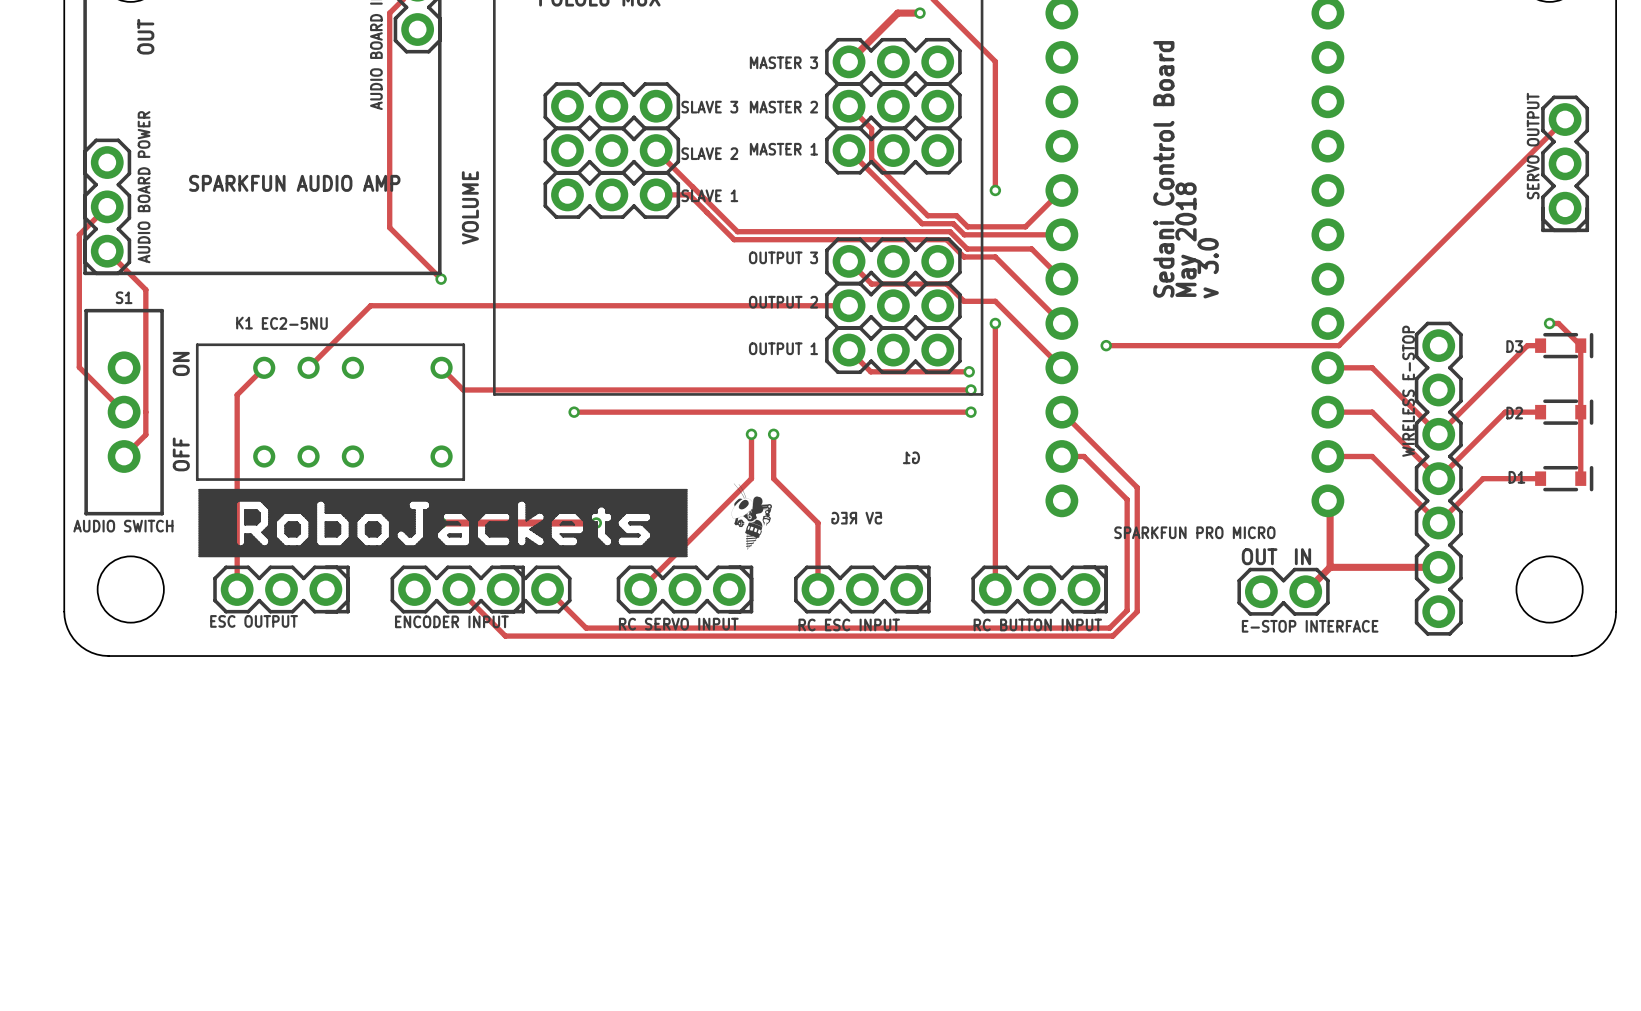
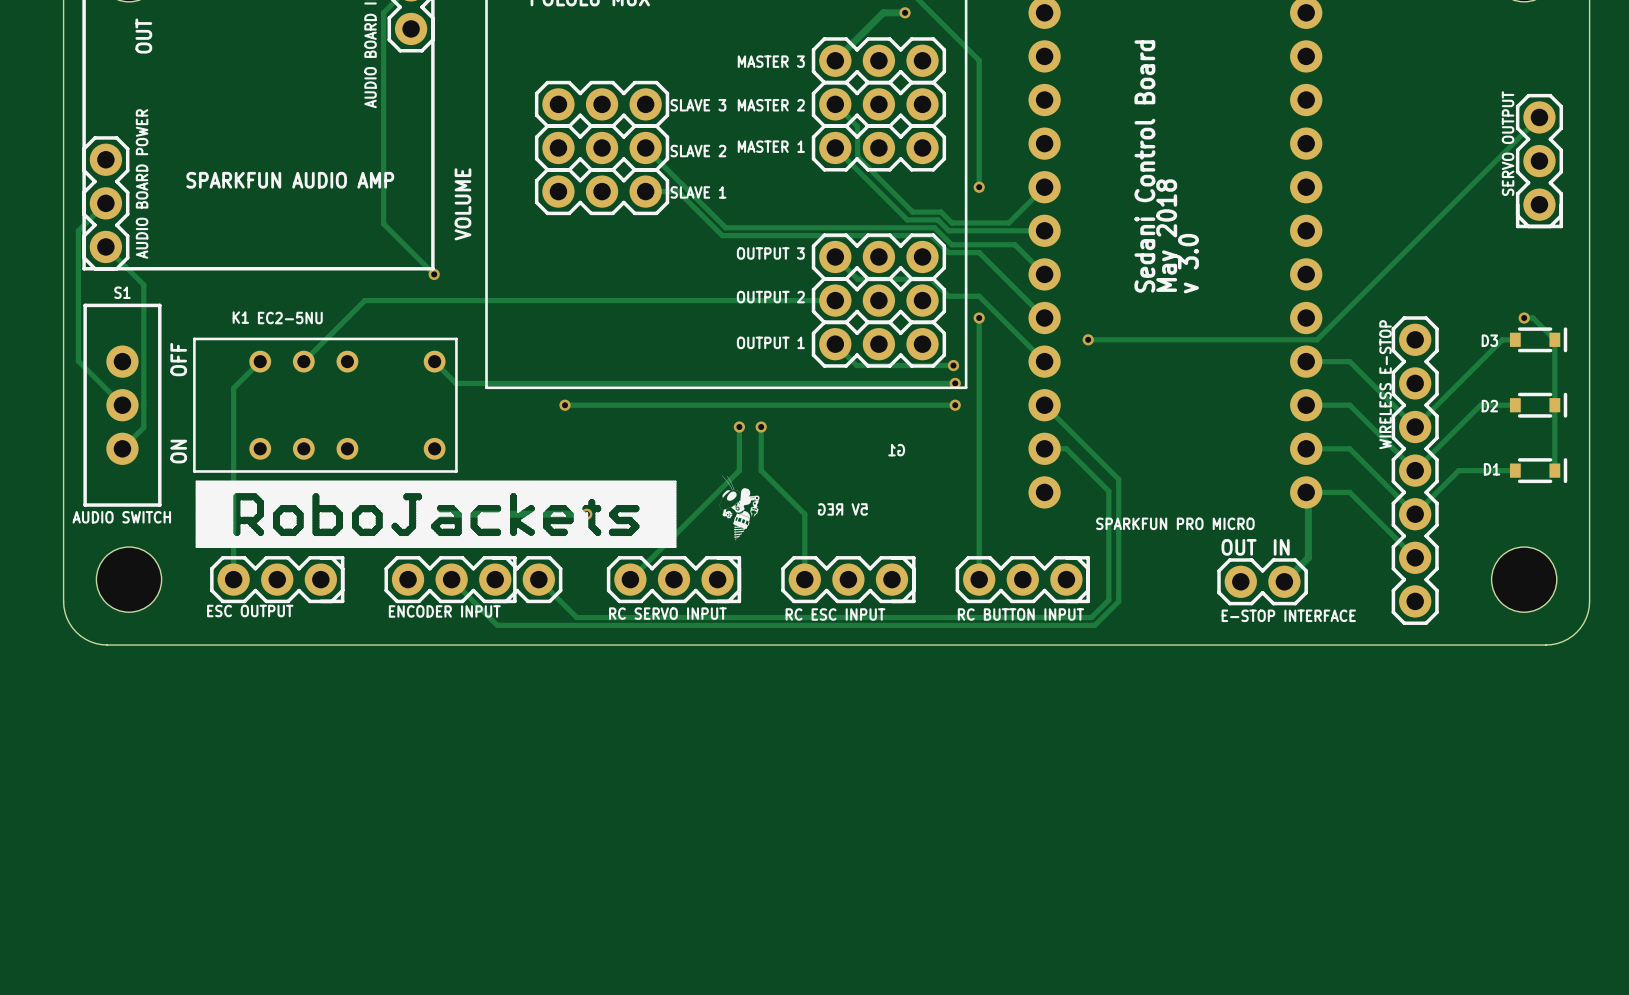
text: ON (181, 363) -> OFF (178, 359)
text: OFF (181, 454) -> ON (178, 451)
track: (1330, 567) (1438, 567) -> (1306, 492) (1349, 492) (1415, 557)

